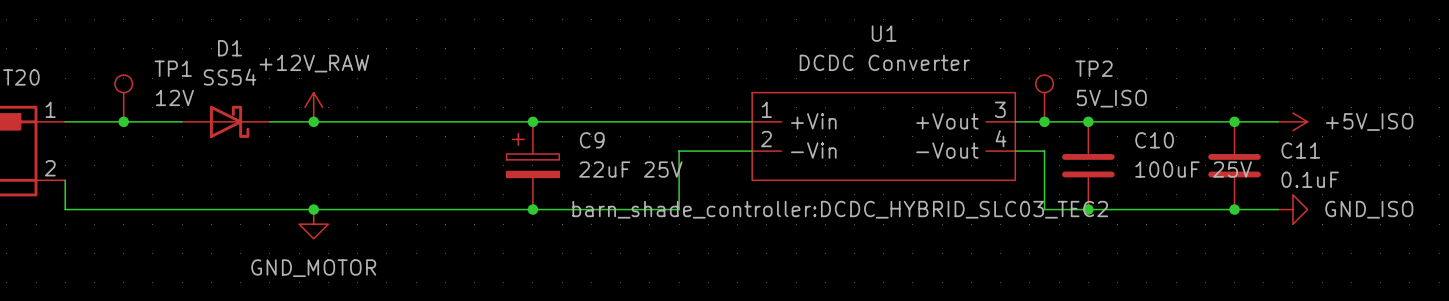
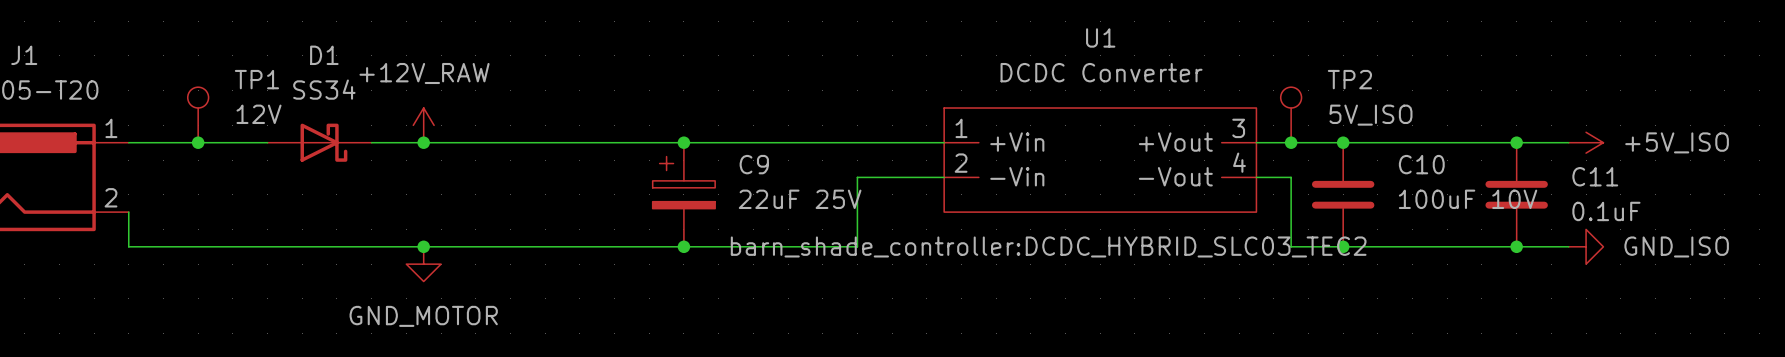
D1 value: SS54 (230, 77) -> SS34 (324, 89)
C10 value: 100uF 25V (1193, 169) -> 100uF 10V (1468, 199)

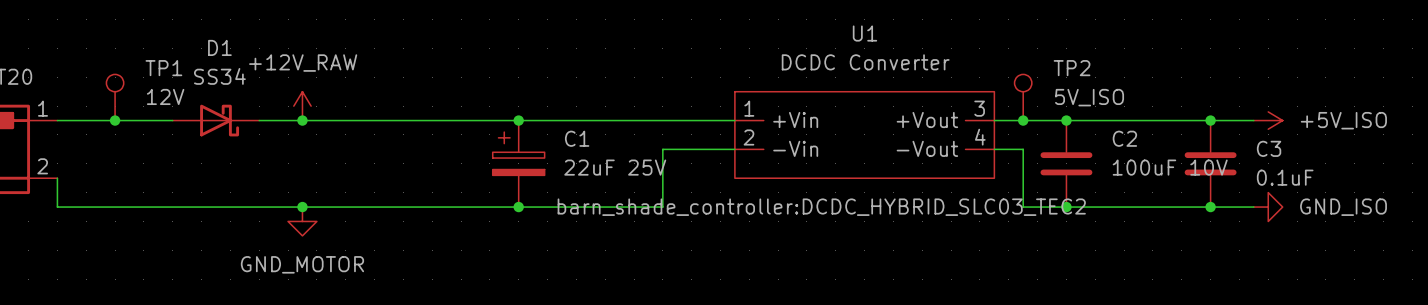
C9 name: C9 (754, 164) -> C1 (577, 138)
C10 name: C10 (1421, 164) -> C2 (1124, 138)
C11 name: C11 (1595, 176) -> C3 (1269, 148)

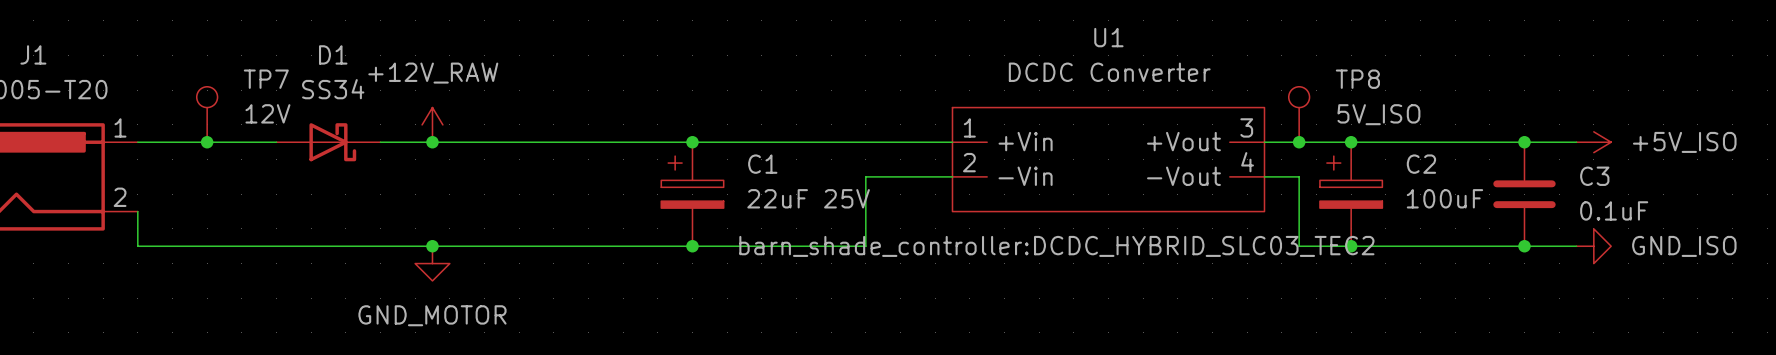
TP1 name: TP1 (163, 68) -> TP7 (266, 79)
TP2 name: TP2 (1072, 68) -> TP8 (1357, 79)
C2 symbol: [1040, 120, 1093, 208] -> [1319, 142, 1383, 247]
C2 value: 100uF 10V (1170, 167) -> 100uF (1444, 198)

